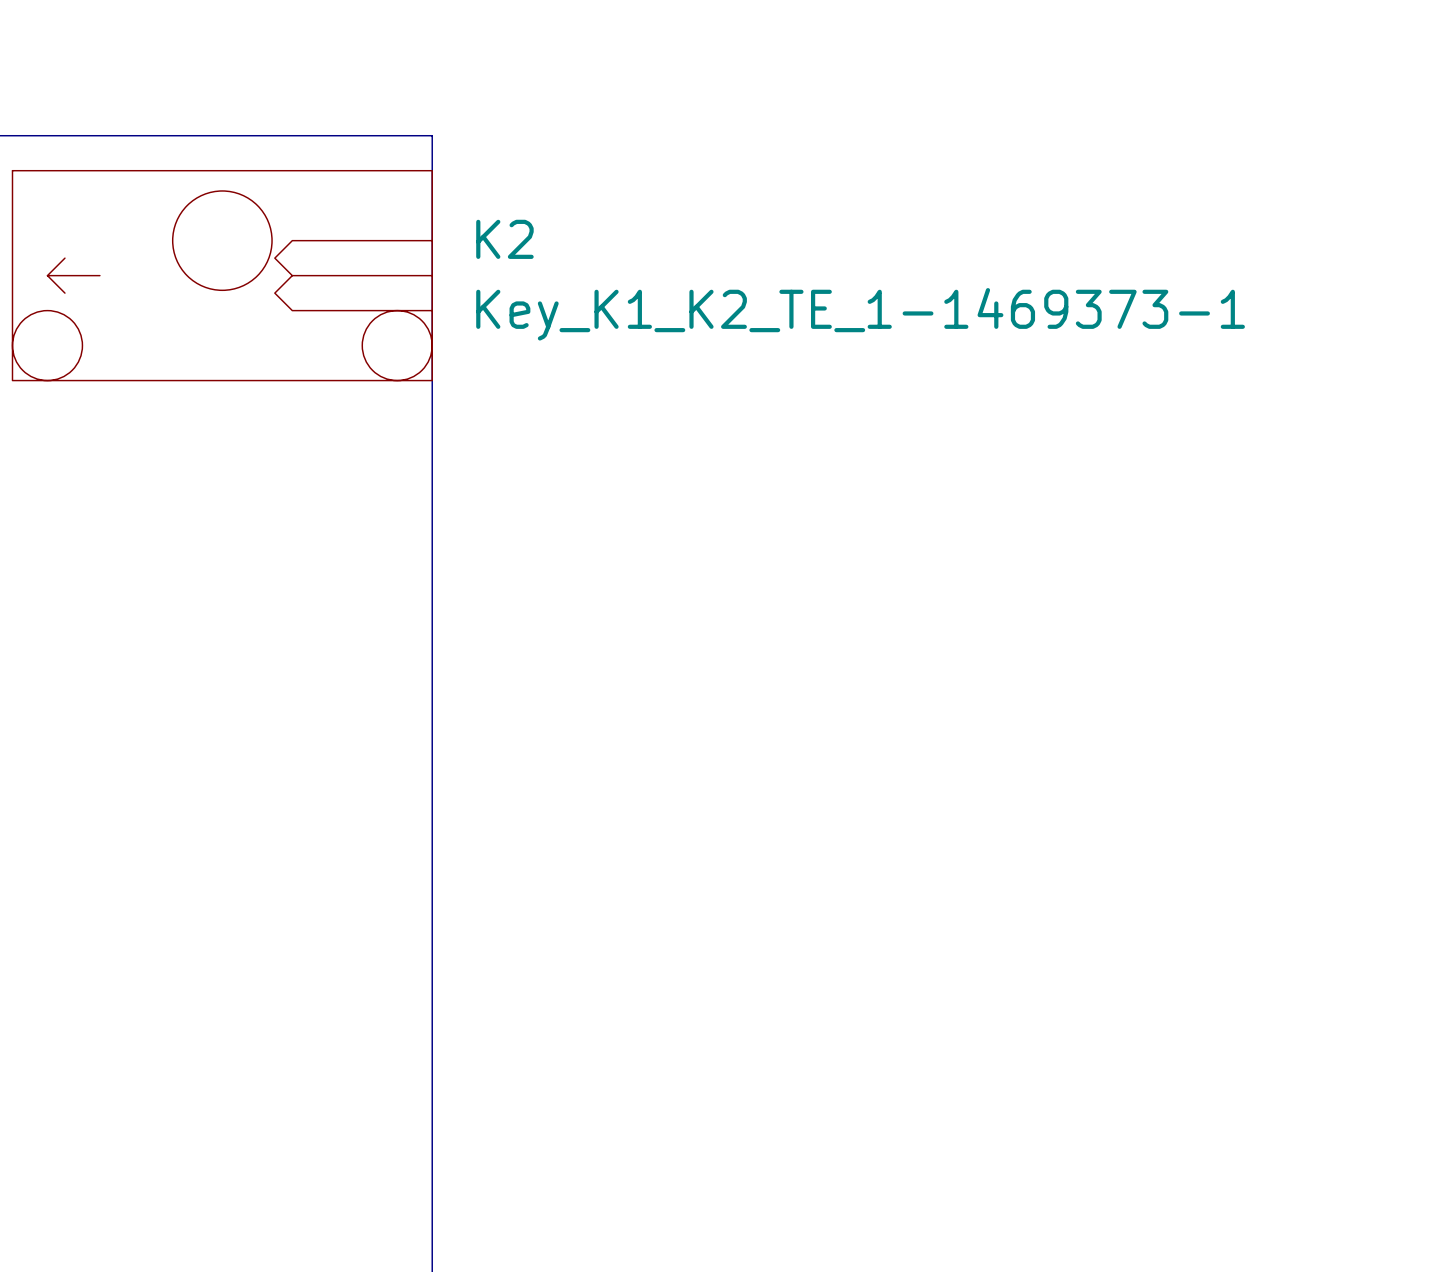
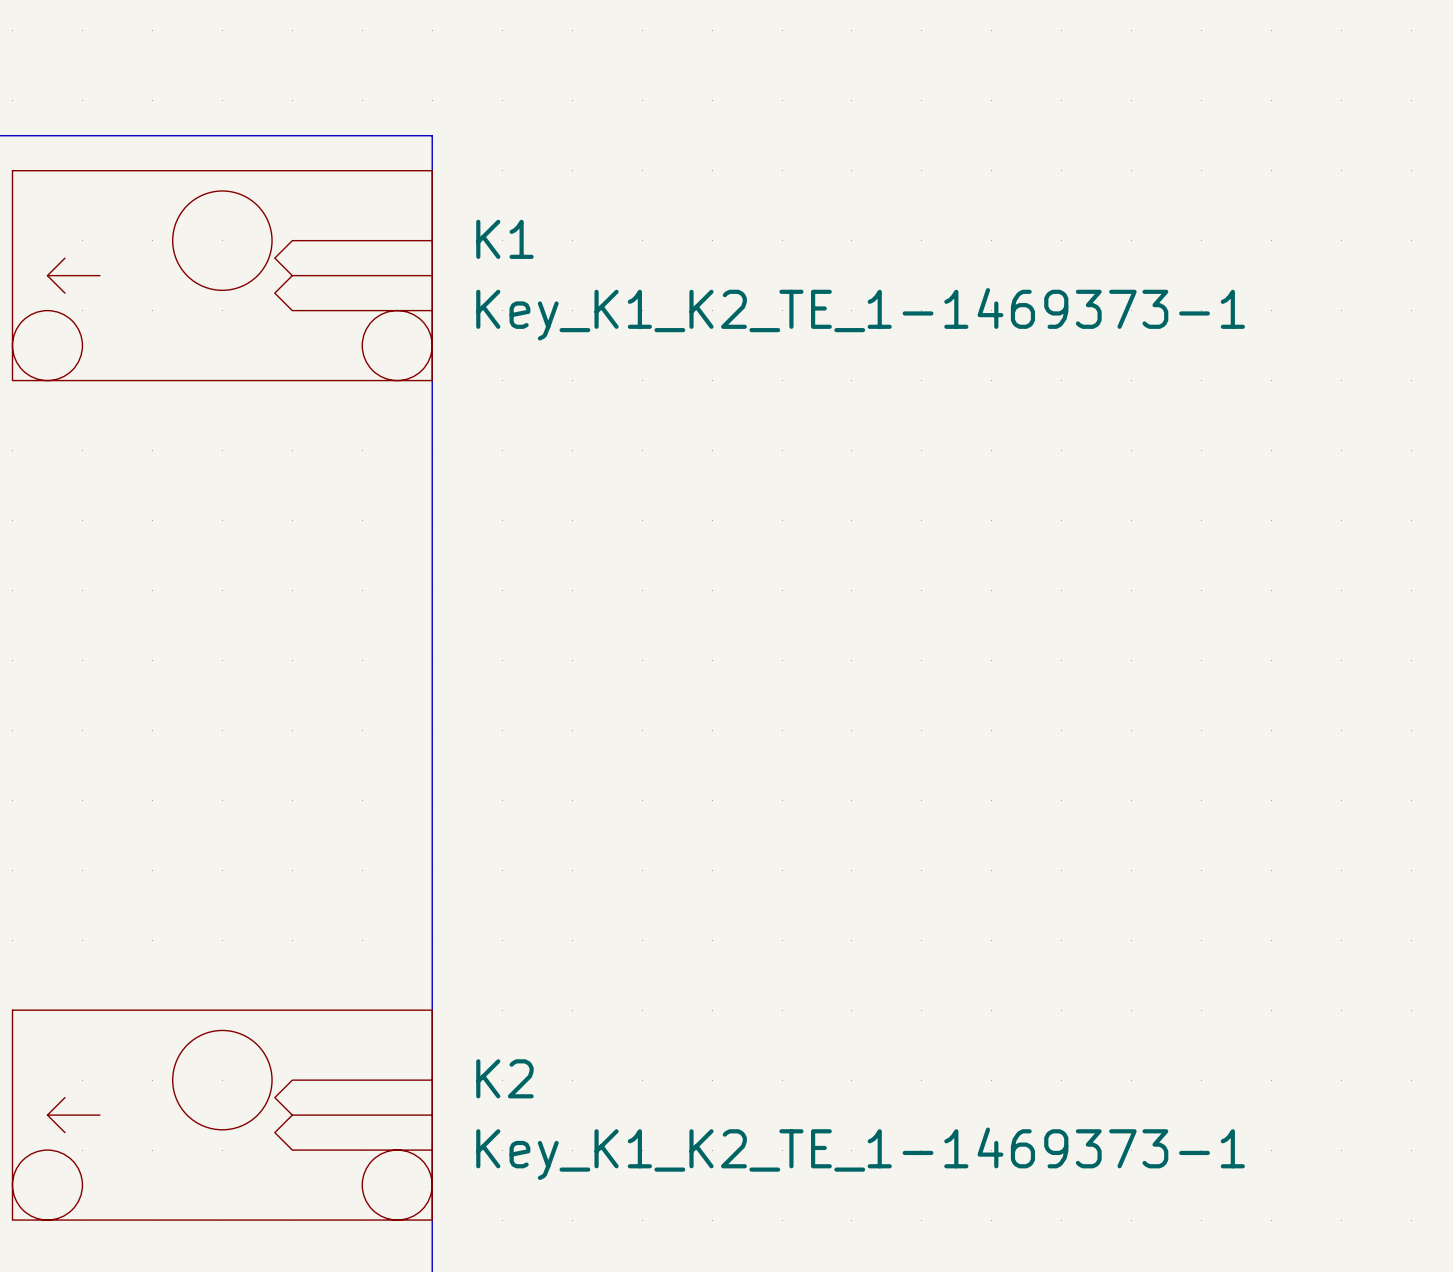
K2 name: K2 (504, 239) -> K1 (504, 239)
K2: none -> Key_K1_K2_TE_1-1469373-1 (222, 1115)

